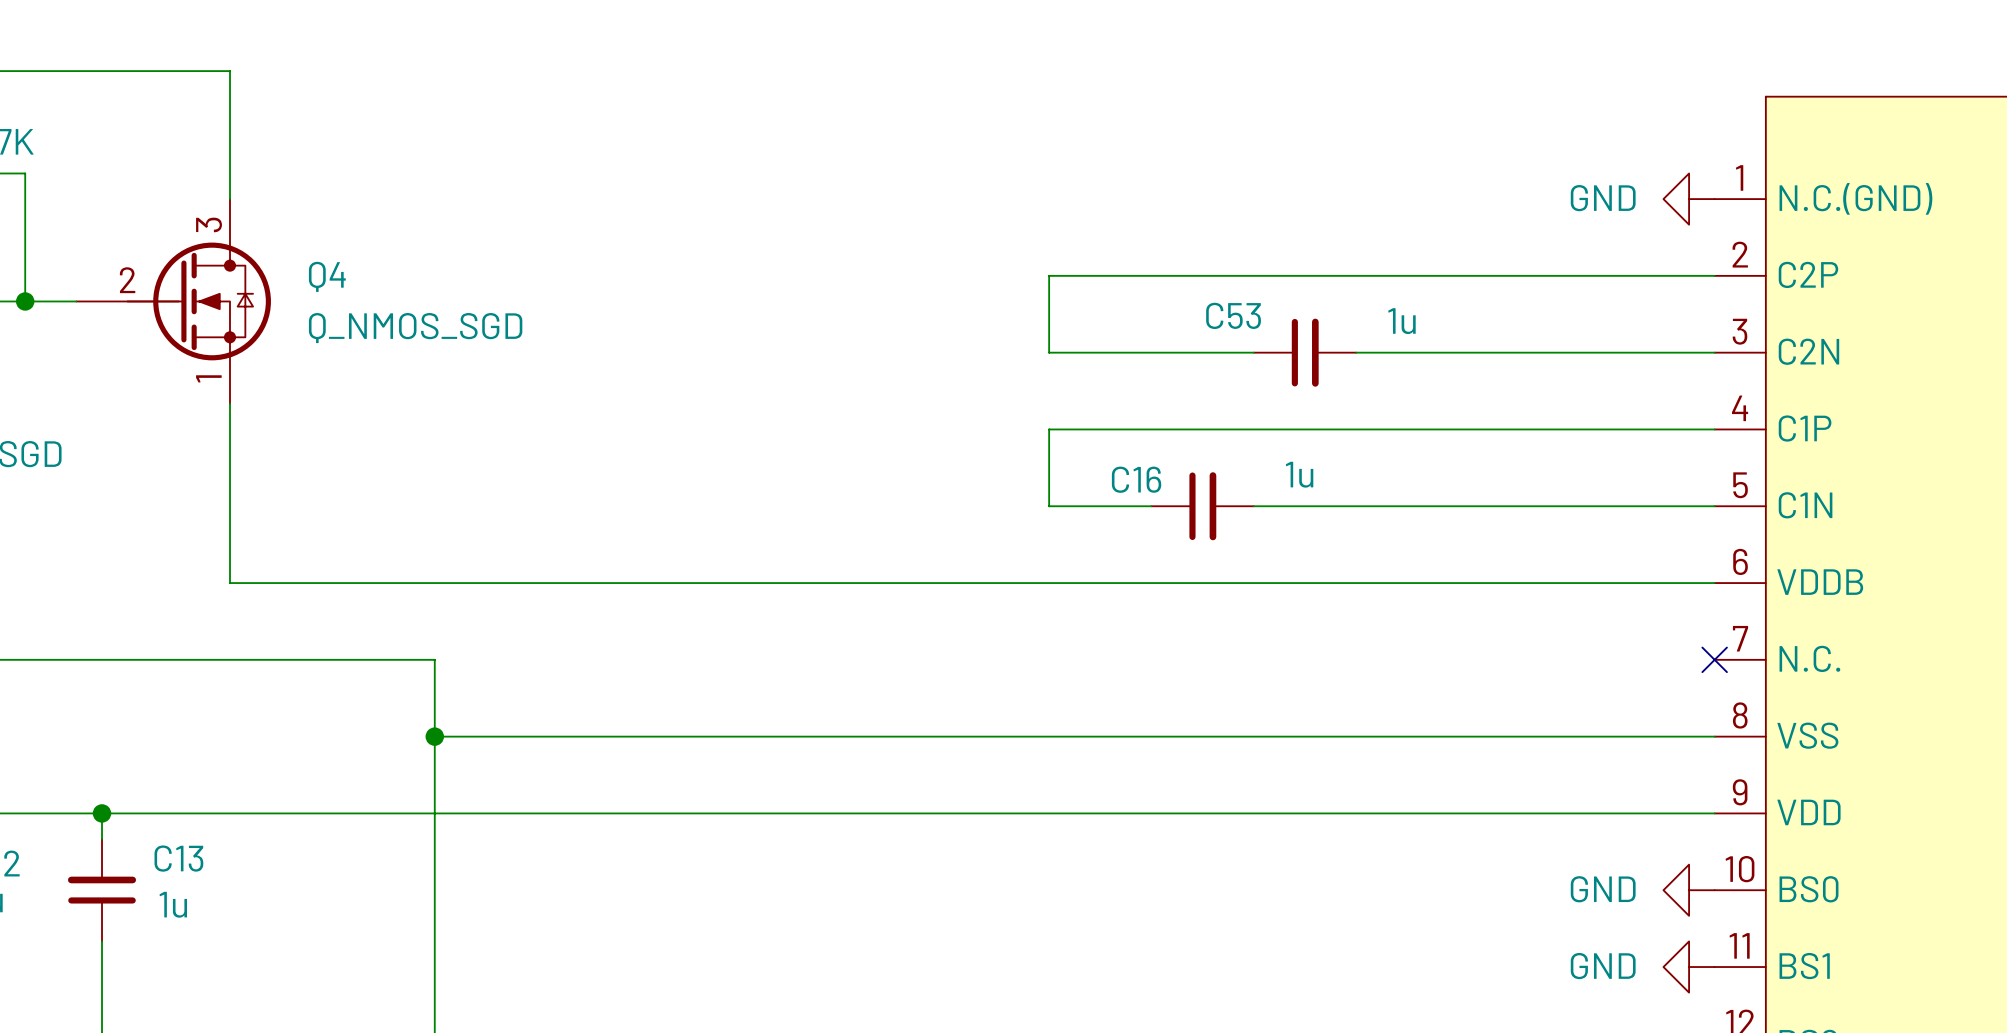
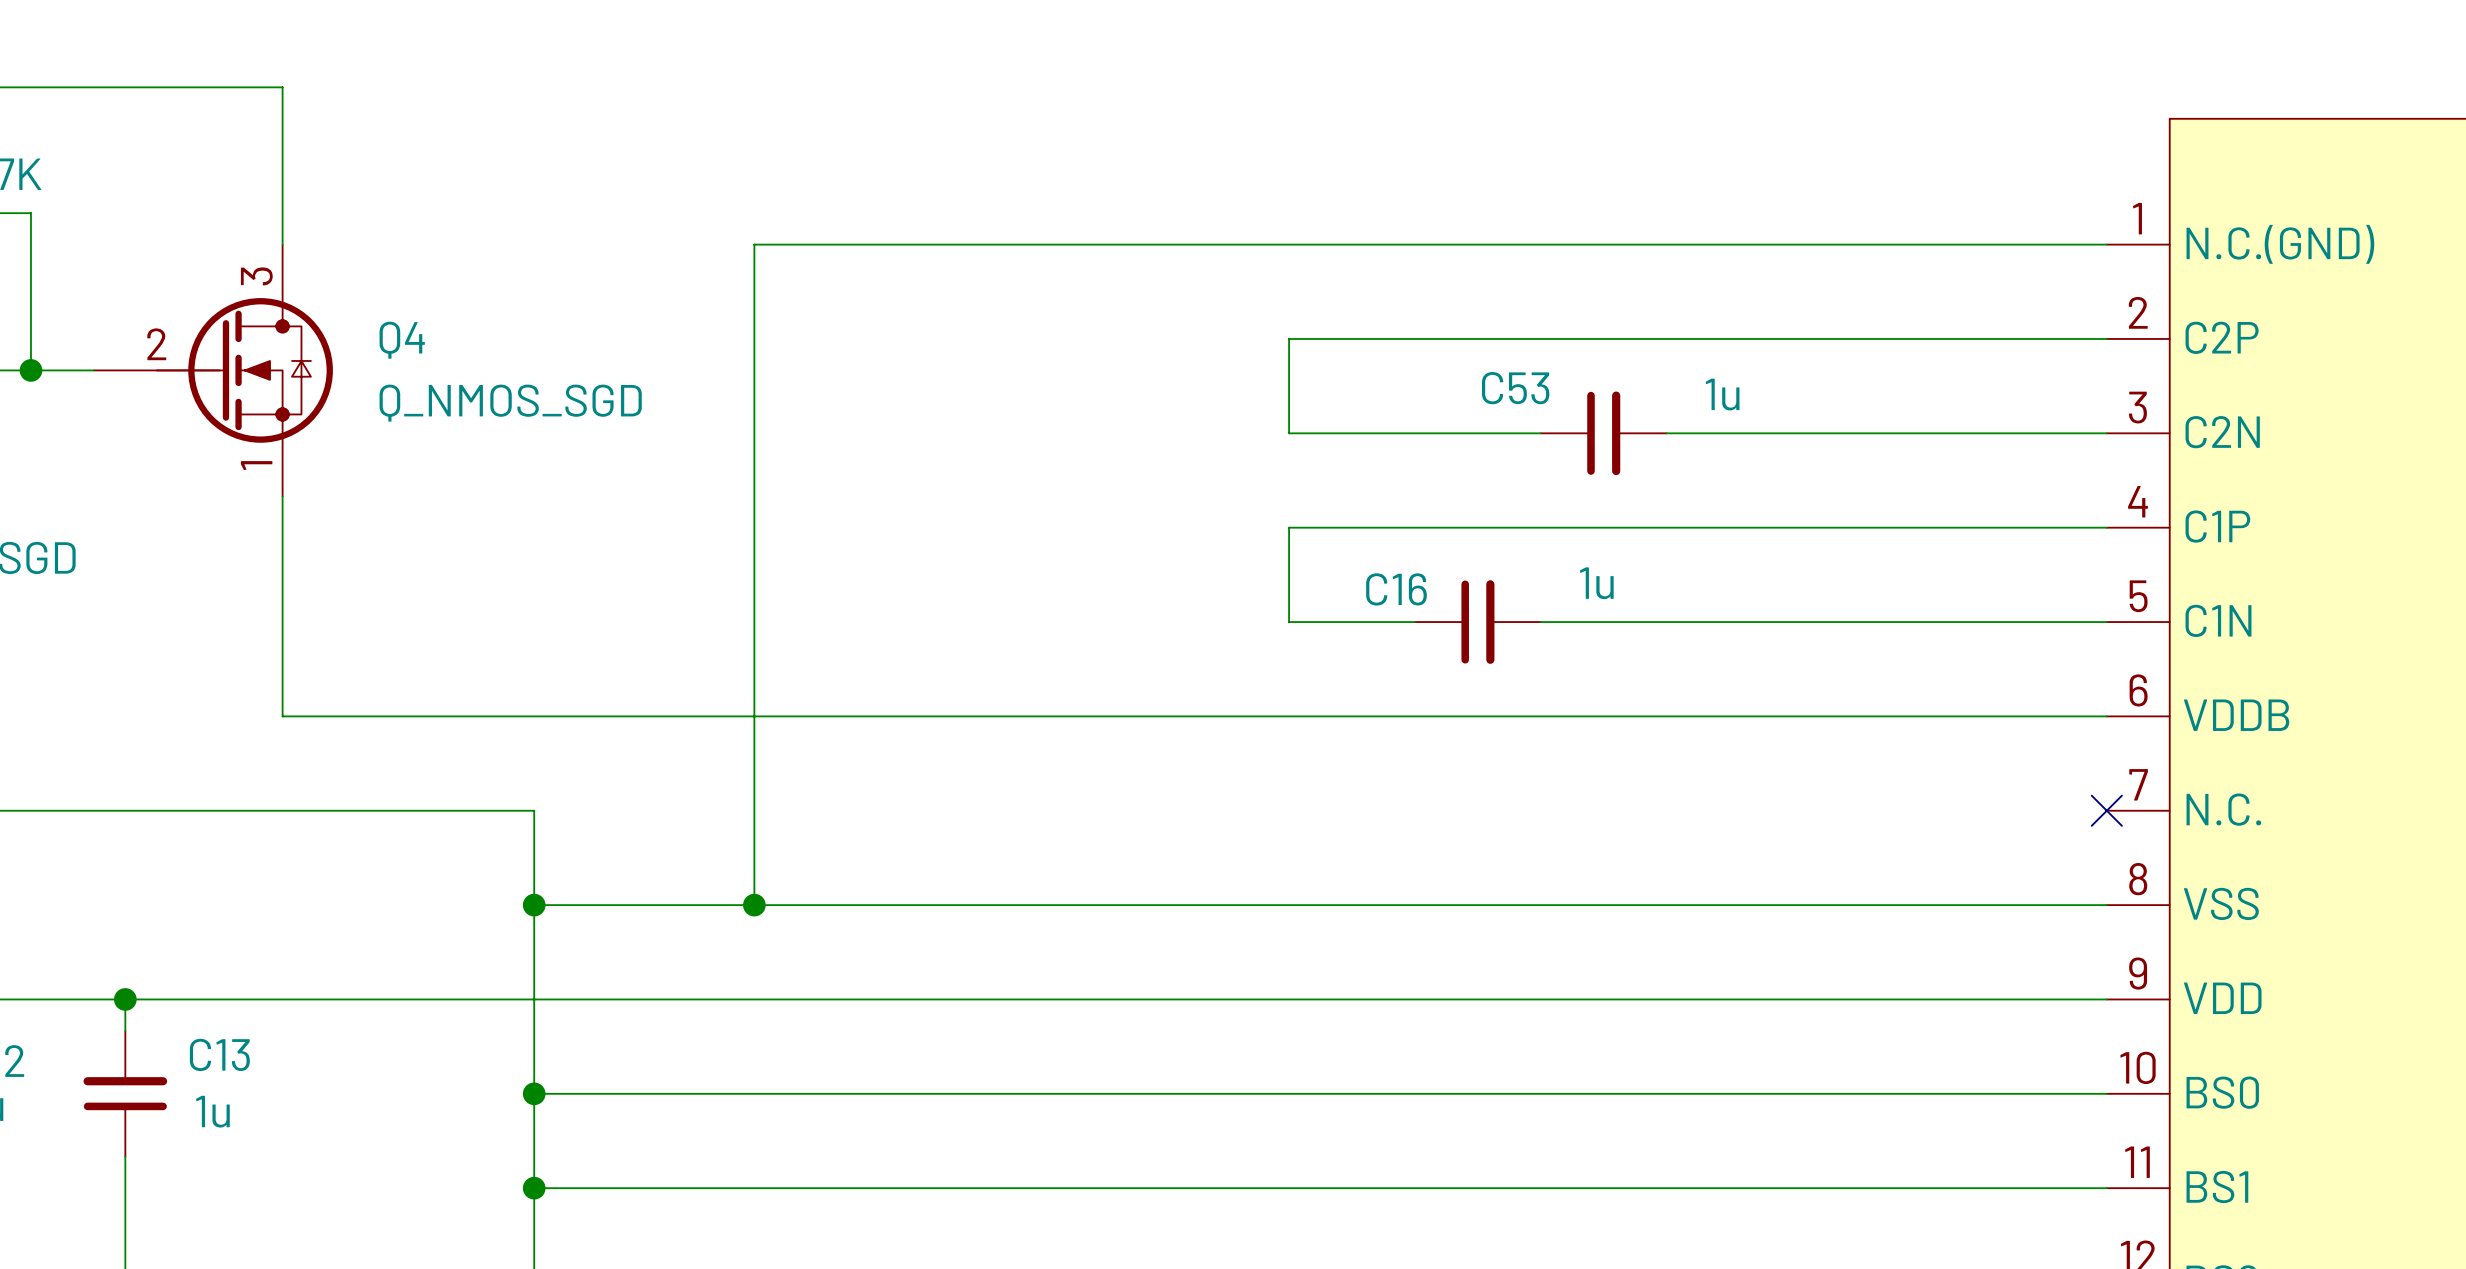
power symbol: GND (1689, 199) -> none
wire: none -> (2106, 244) (754, 244) (754, 905)
junction: none -> (754, 905)
wire: none -> (534, 1093) (2106, 1093)
junction: none -> (534, 1093)
power symbol: GND (1689, 890) -> none
wire: none -> (534, 1188) (2106, 1188)
junction: none -> (534, 1188)
power symbol: GND (1689, 967) -> none

